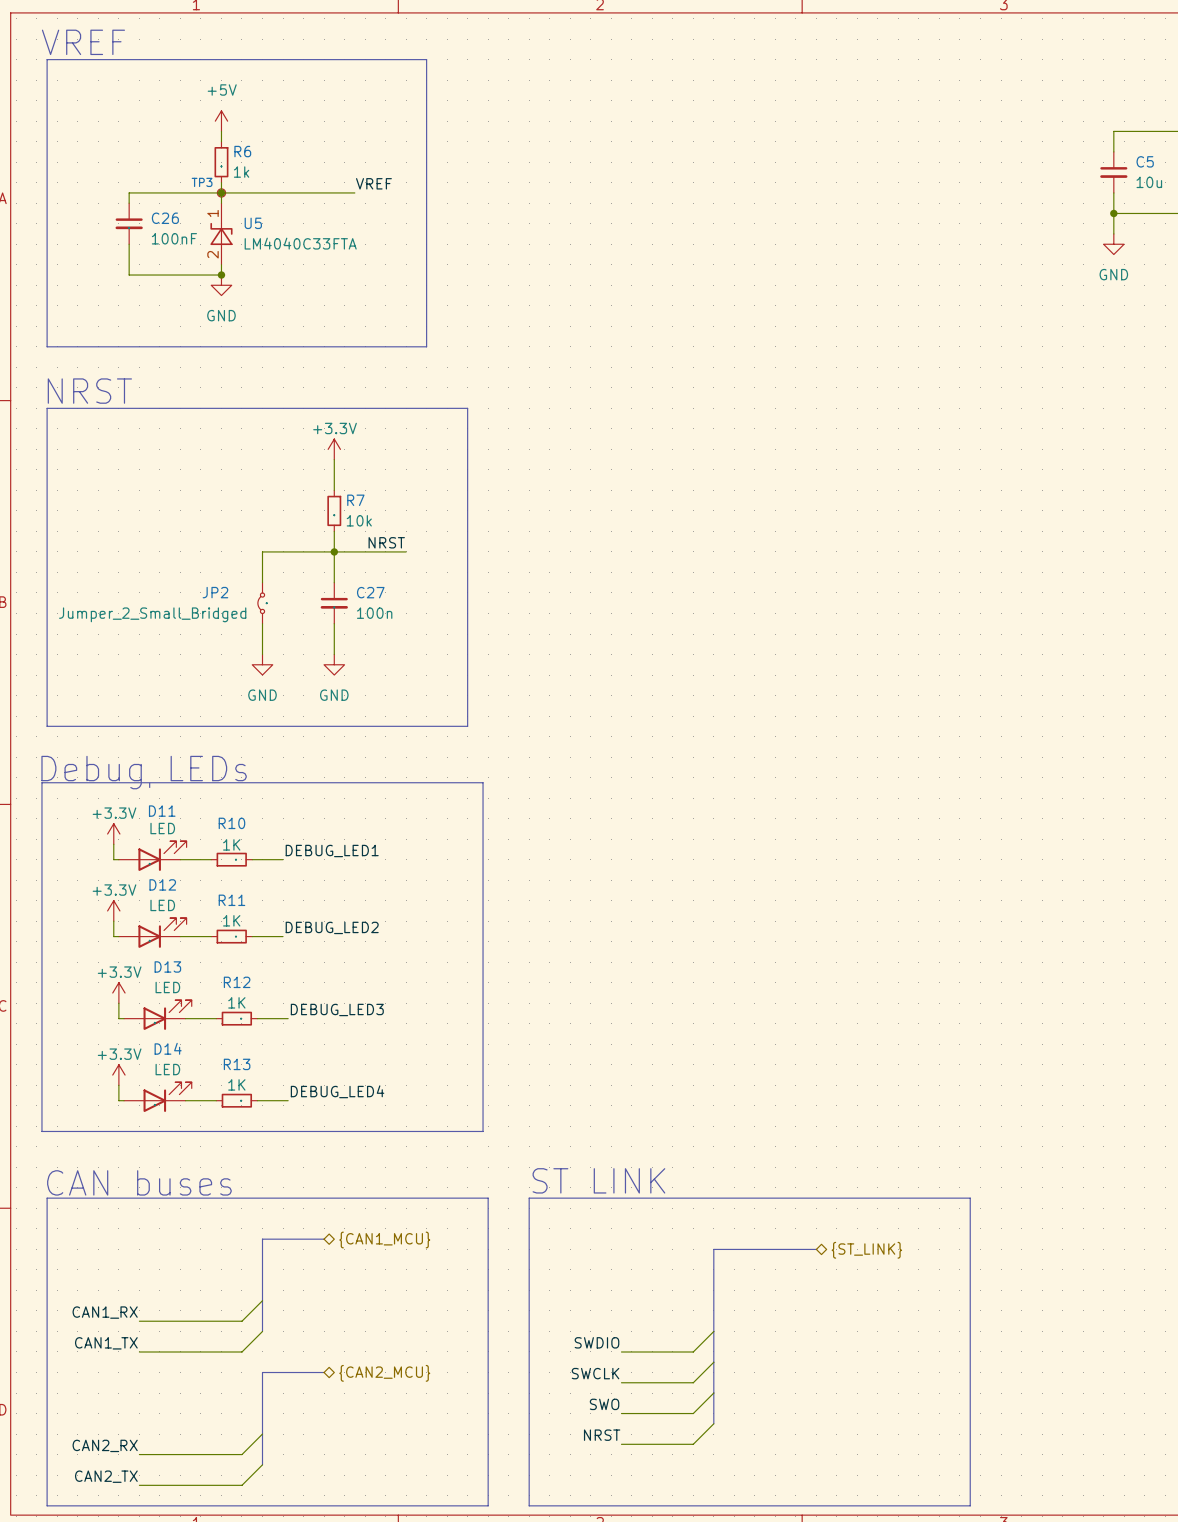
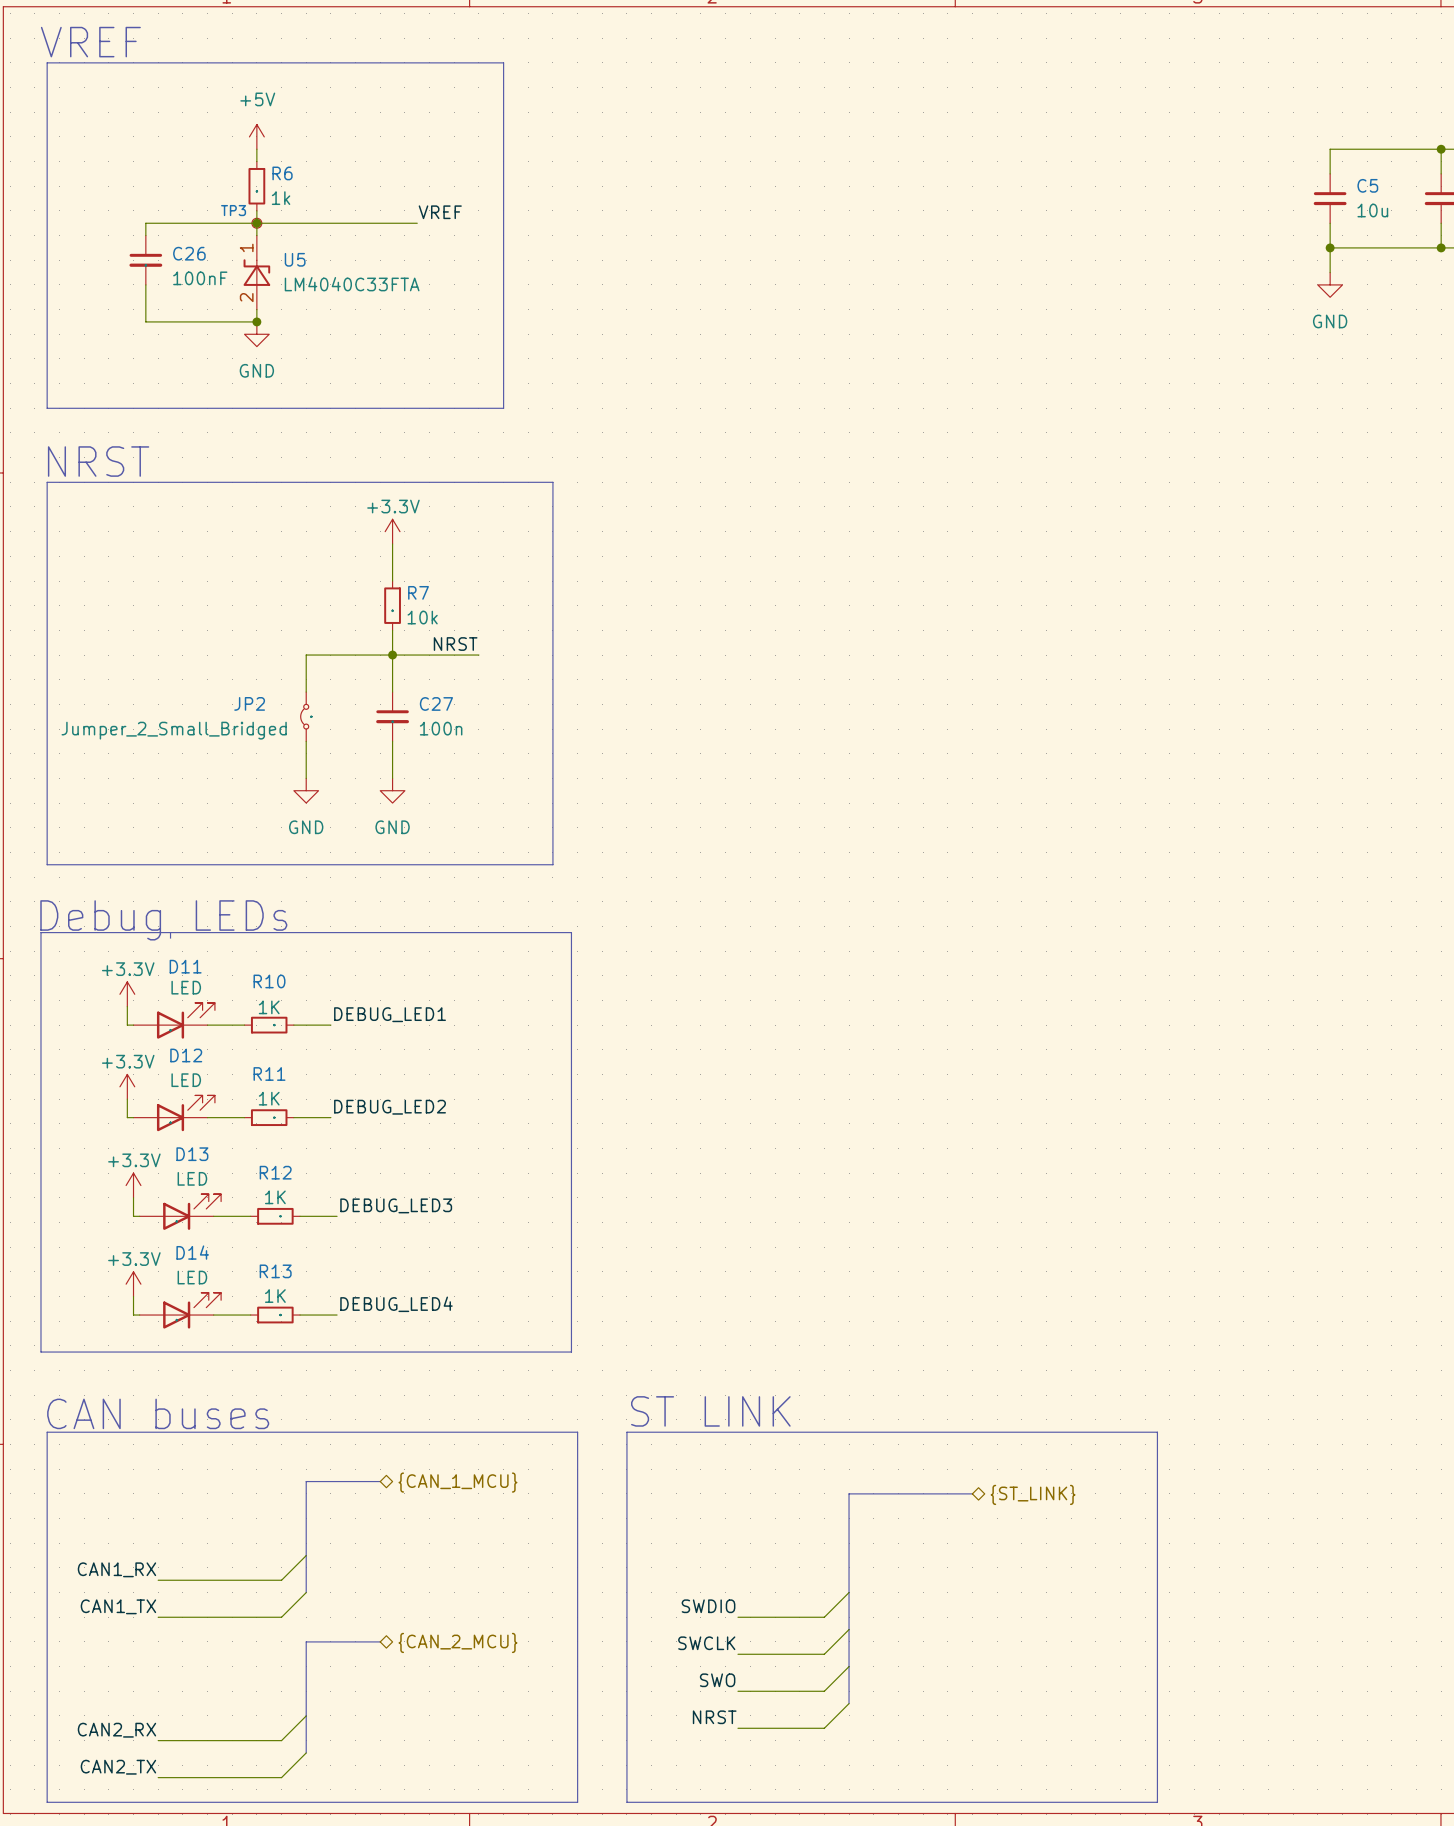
hierarchical label: {CAN1_MCU} (384, 1240) -> {CAN_1_MCU} (457, 1482)
hierarchical label: {CAN2_MCU} (384, 1373) -> {CAN_2_MCU} (457, 1642)

